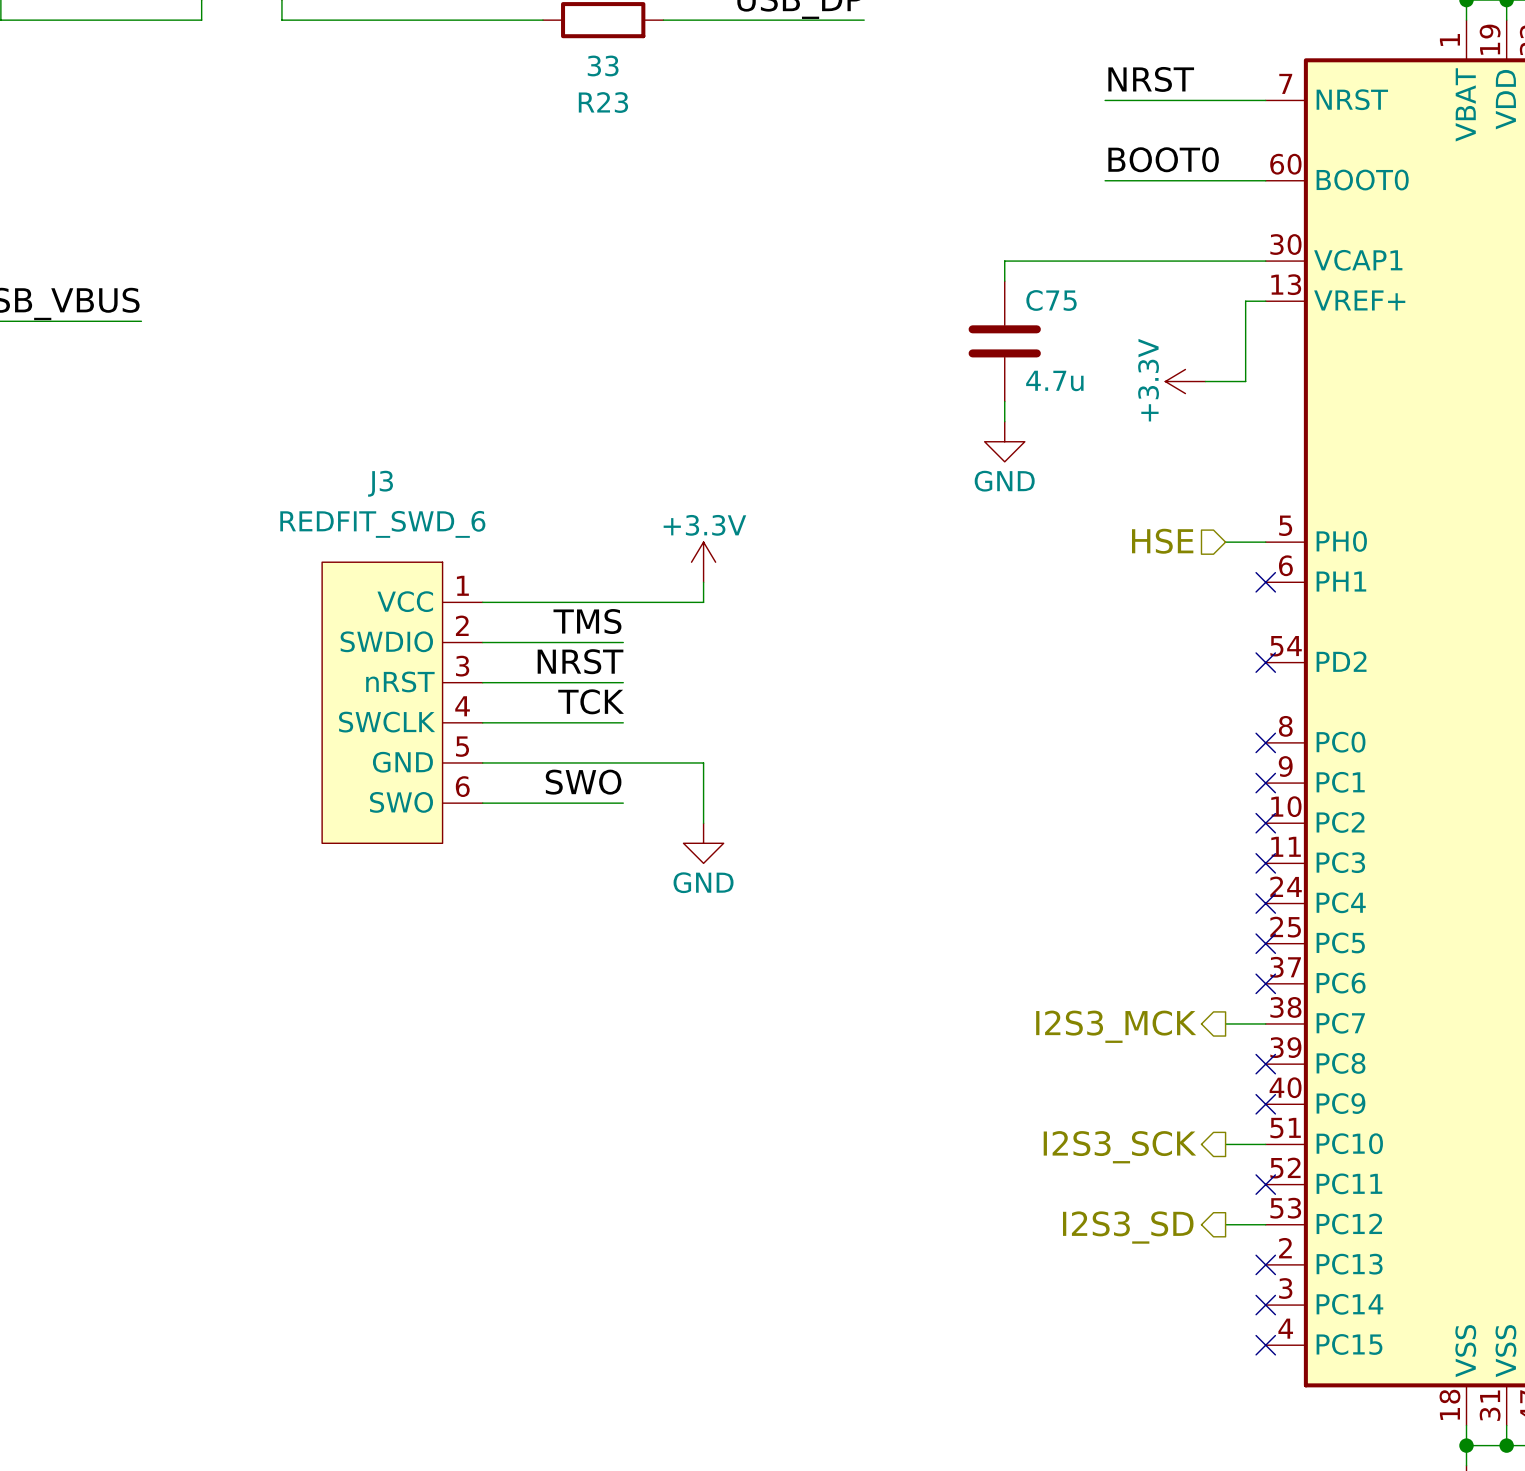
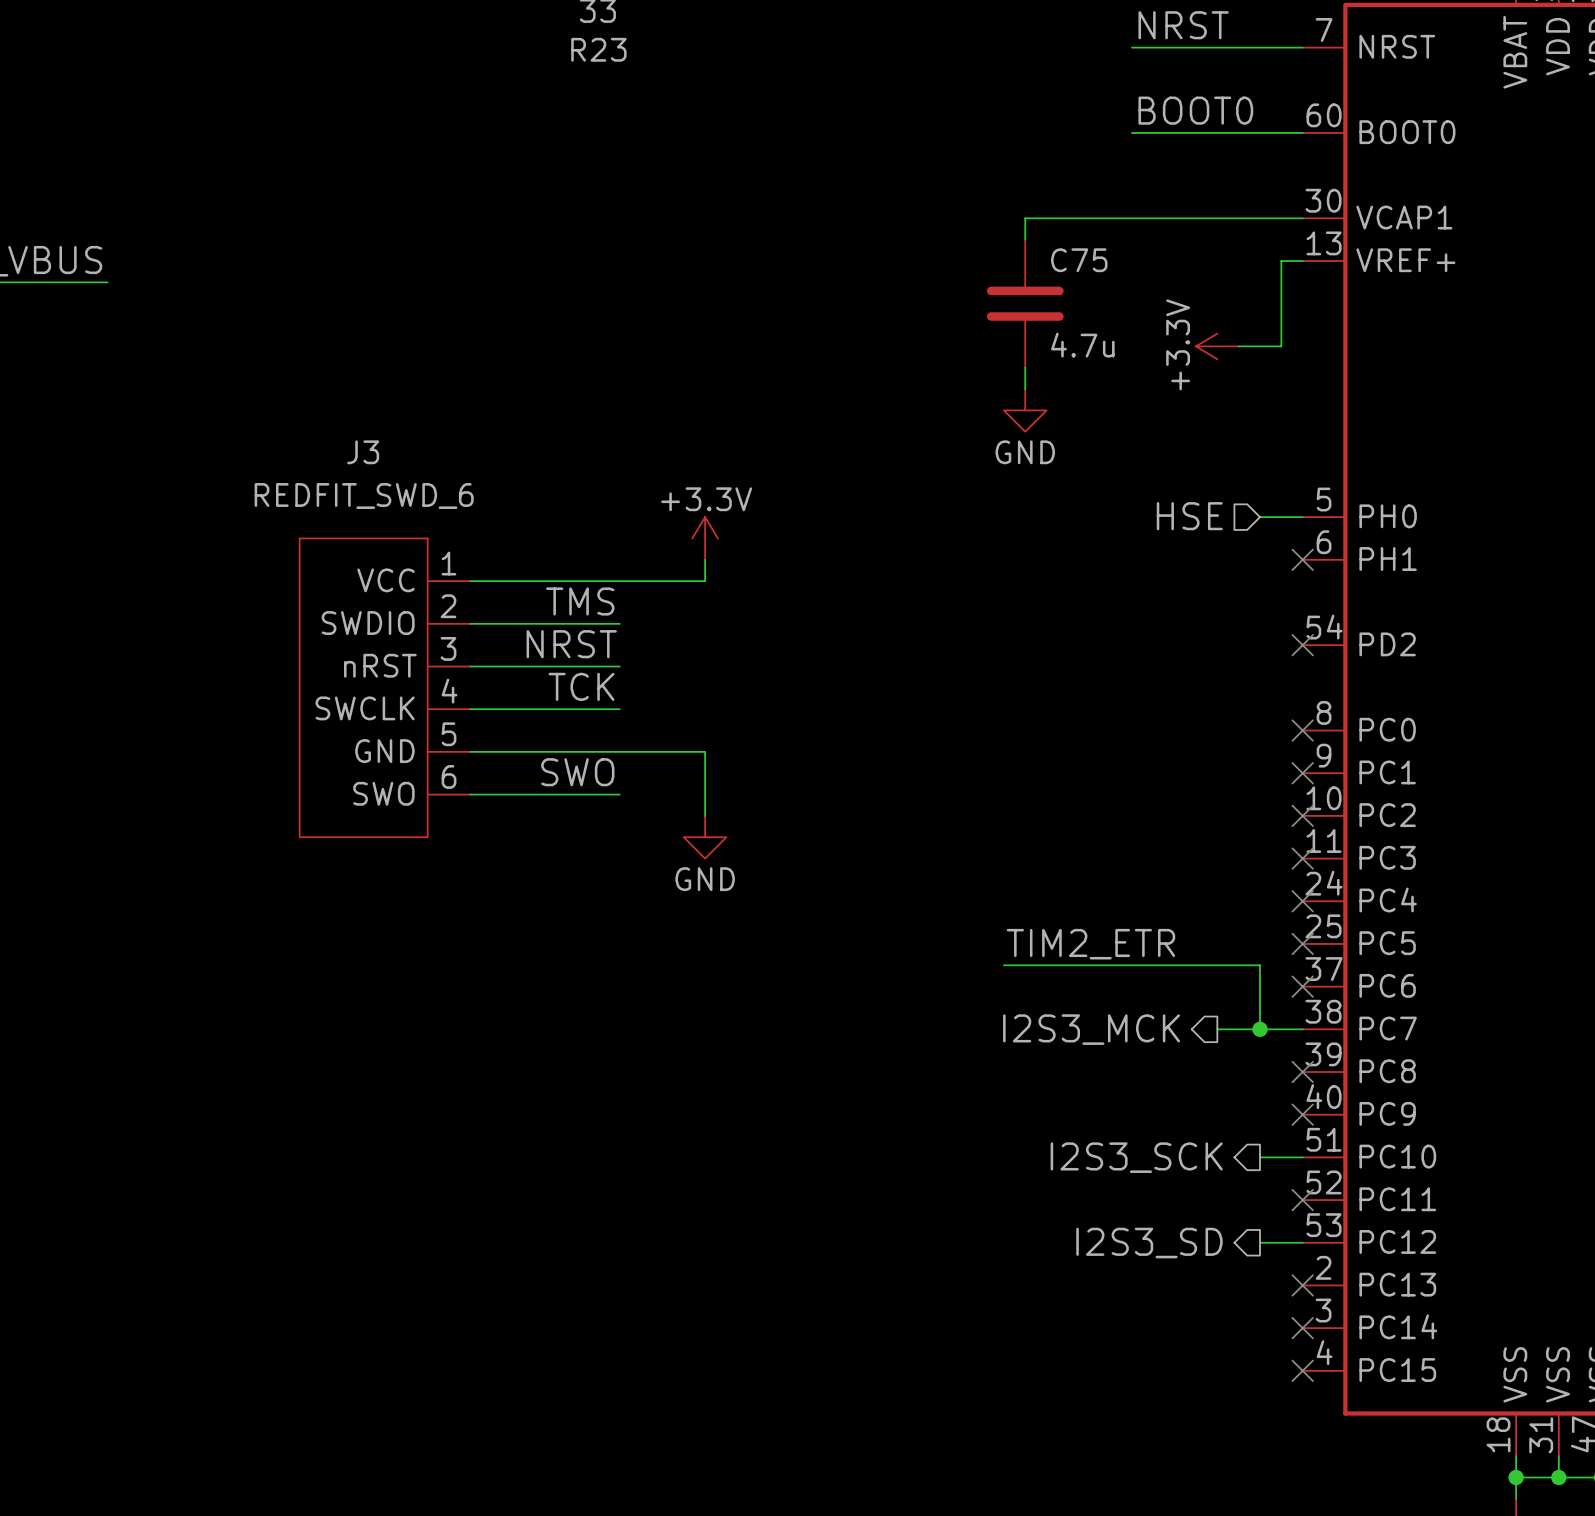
label: none -> TIM2_ETR (1090, 944)
wire: none -> (1003, 965) (1260, 965) (1260, 1029) (1217, 1029)
junction: none -> (1260, 1029)
hierarchical label position: I2S3_MCK (1116, 1026) -> I2S3_MCK (1091, 1029)

